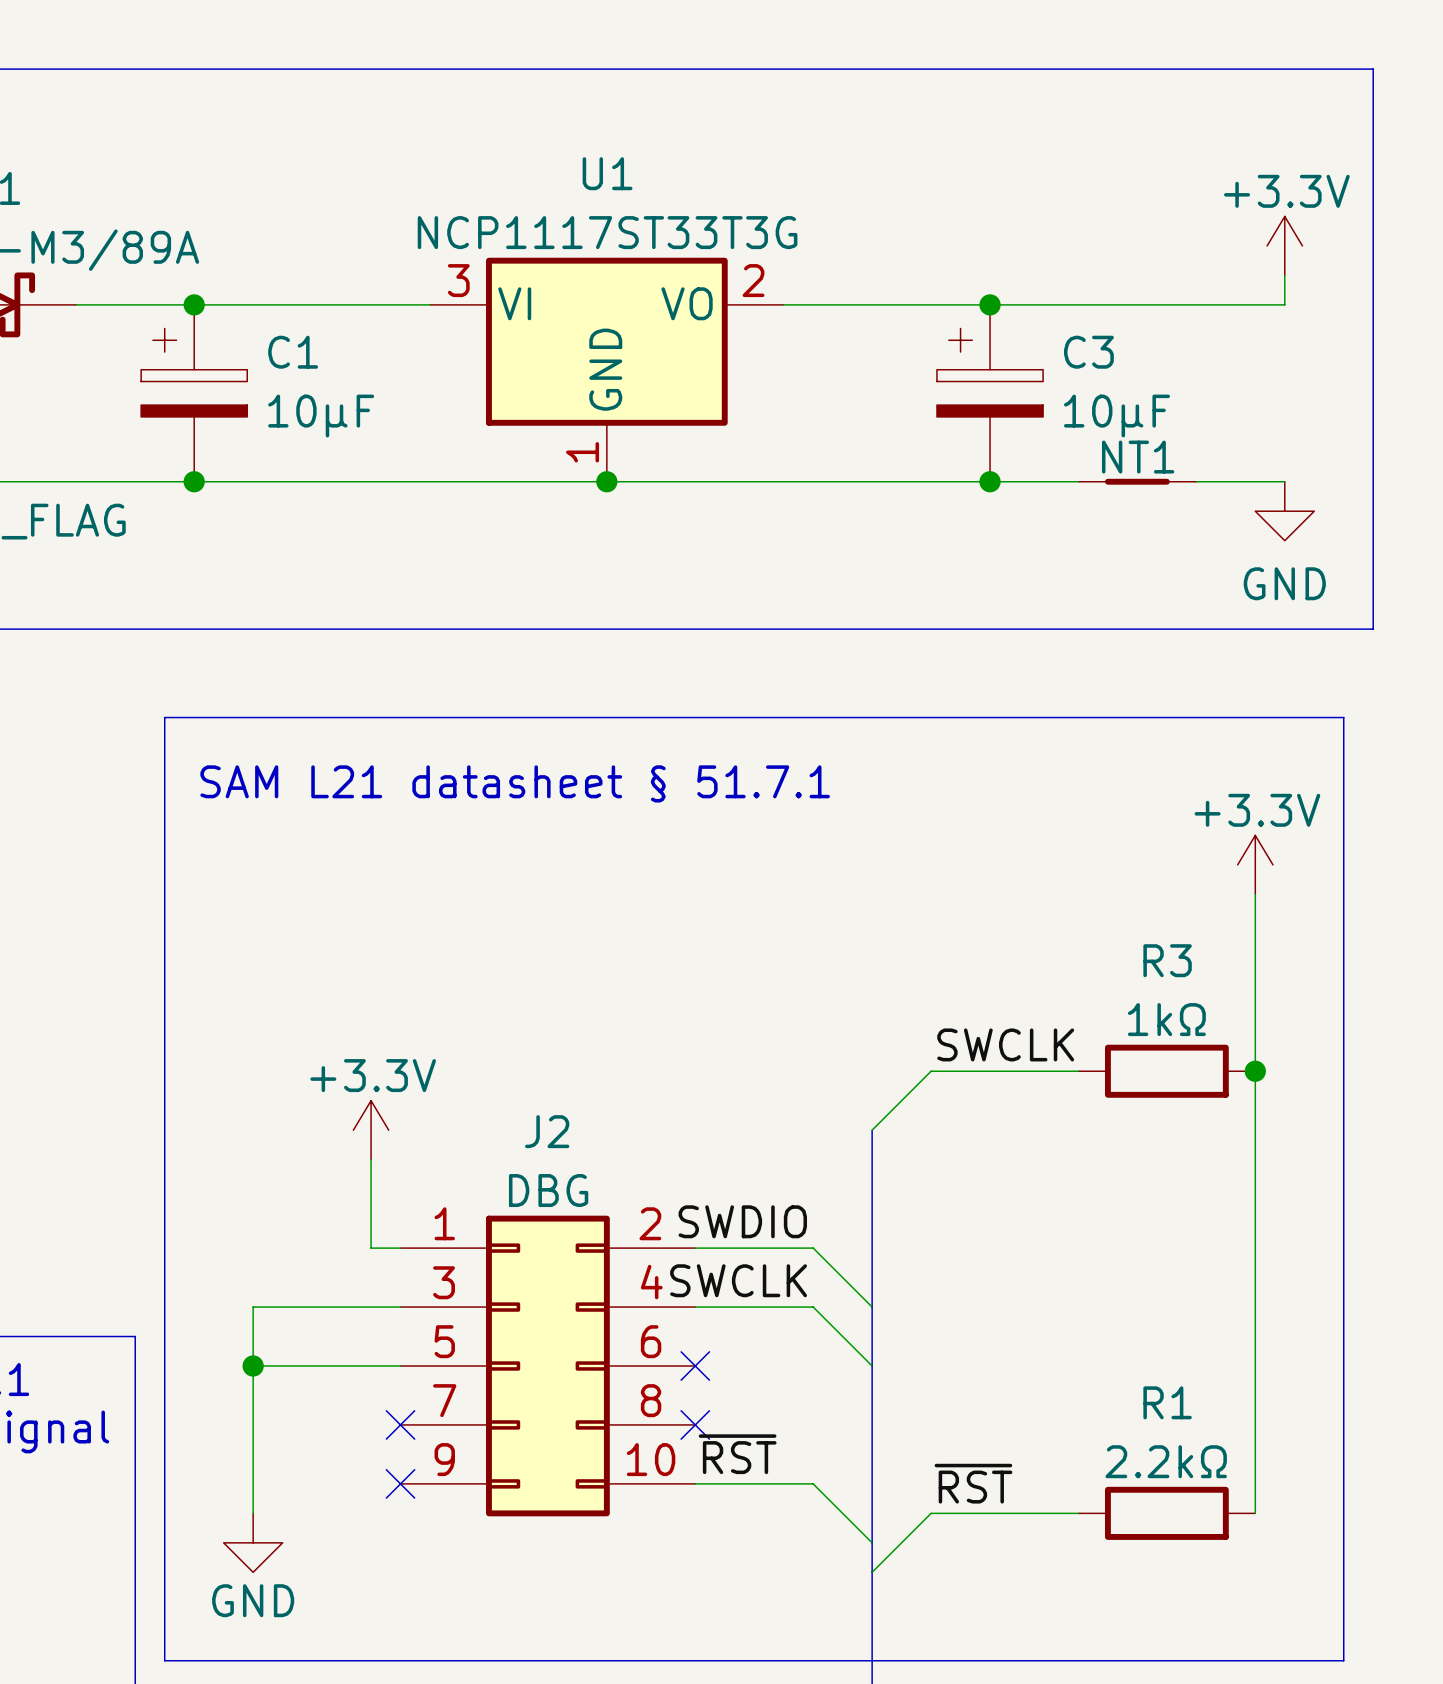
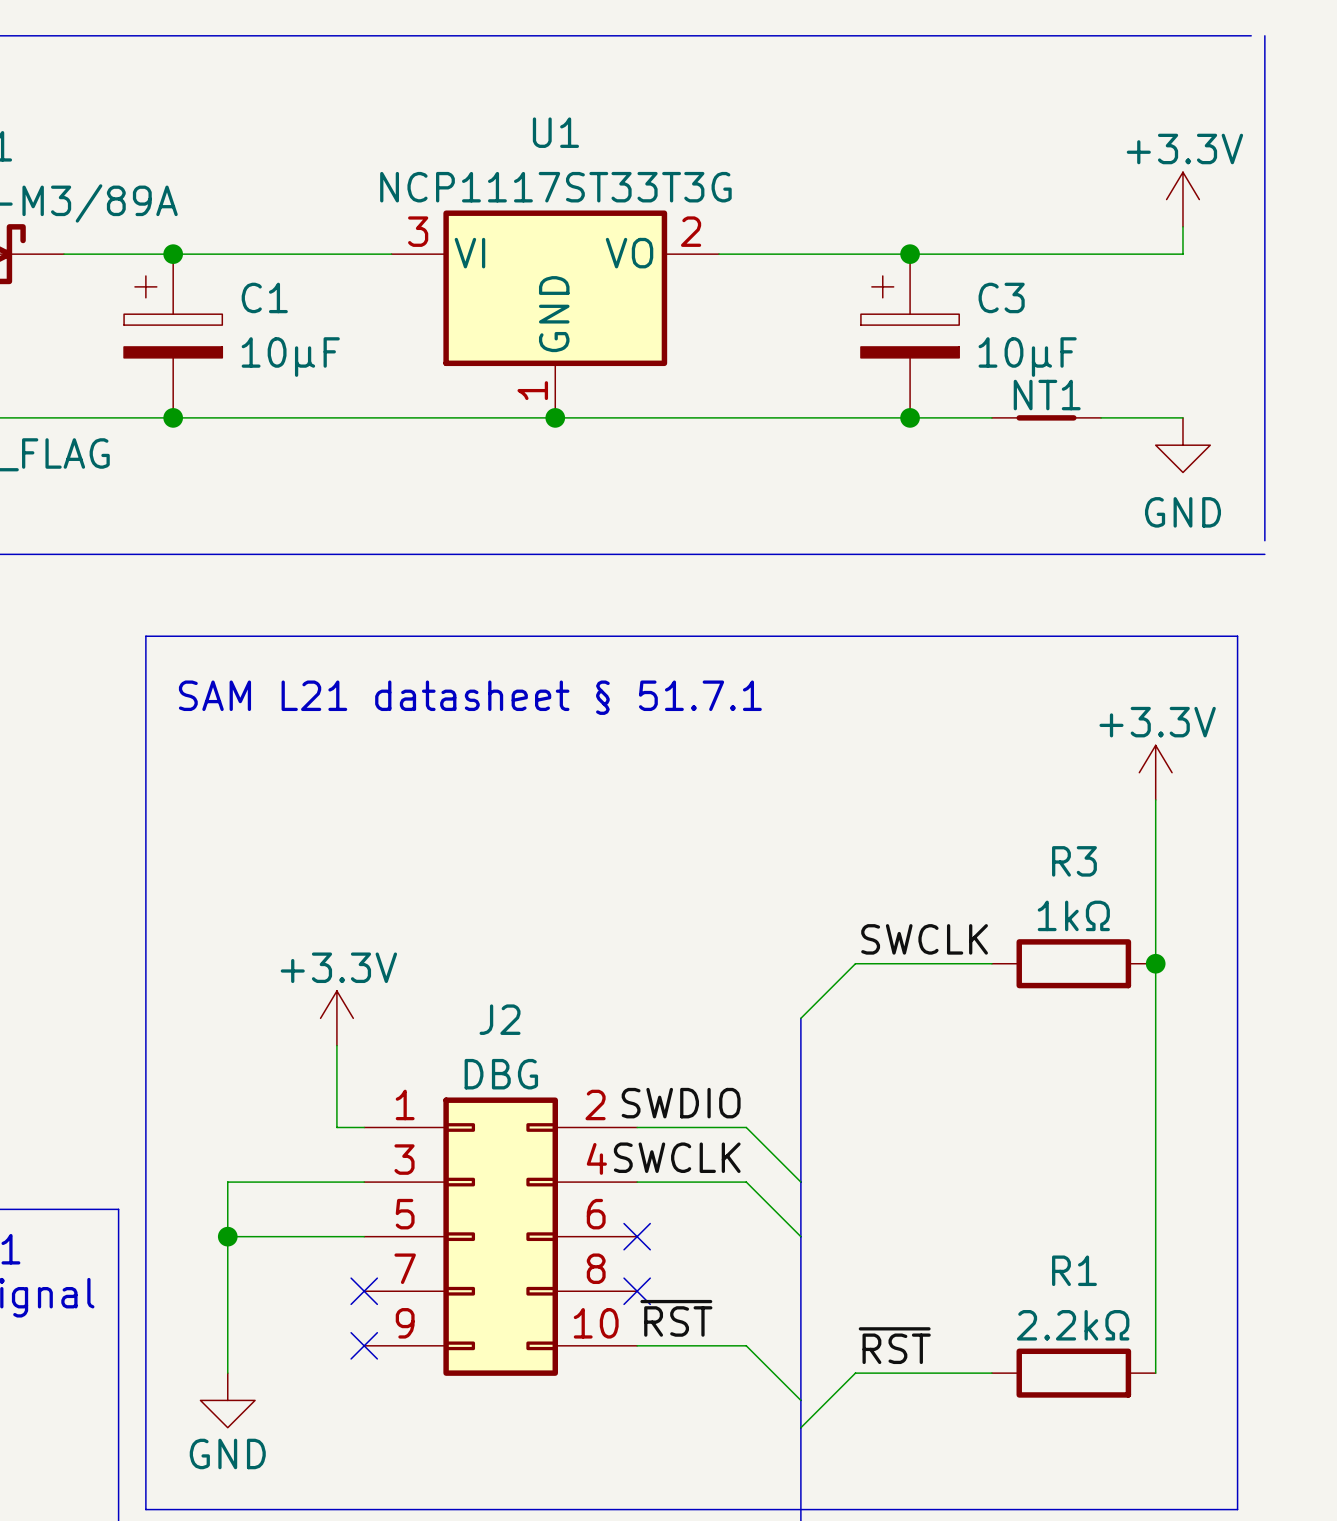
line: (1358, 69) (1373, 69) -> none
line: (1373, 614) (1373, 629) -> none

